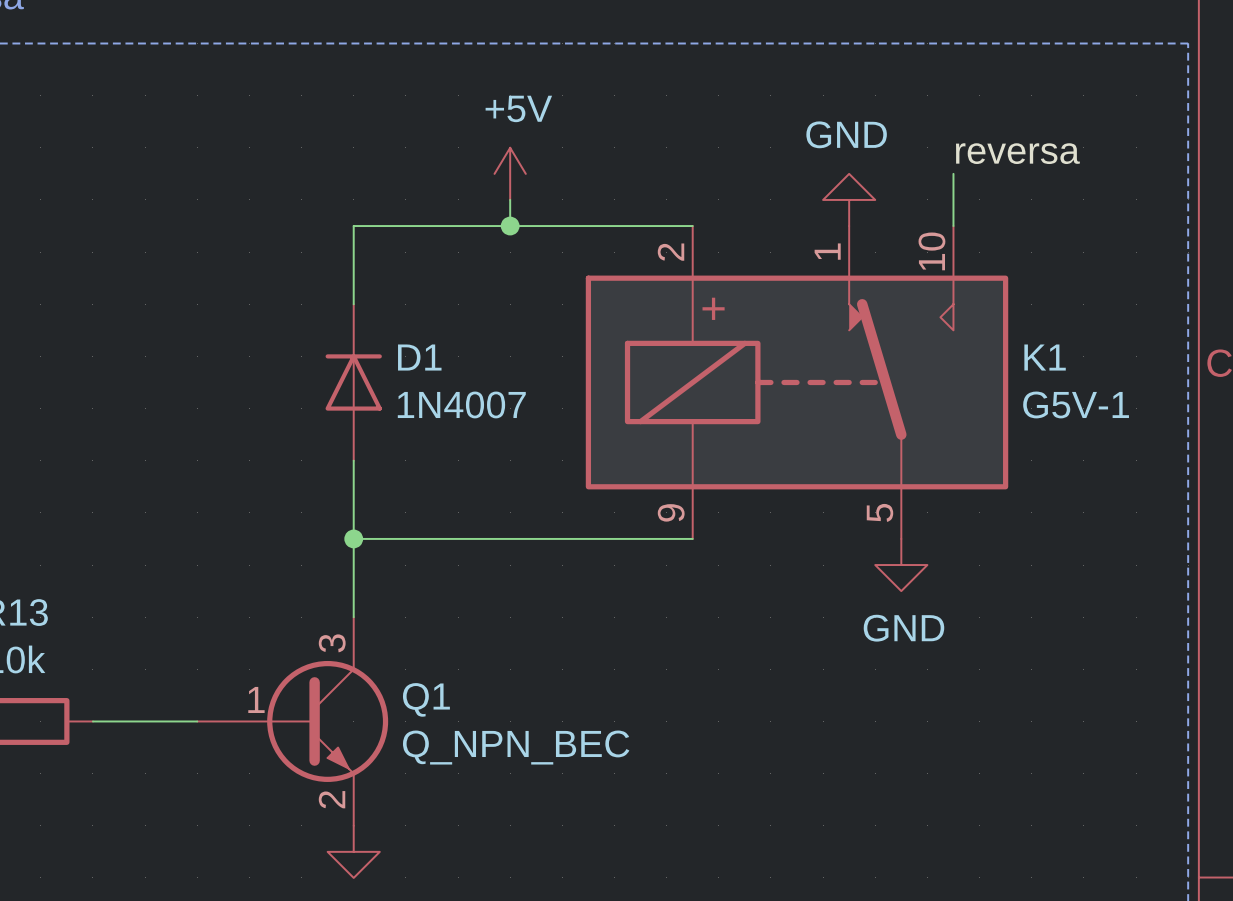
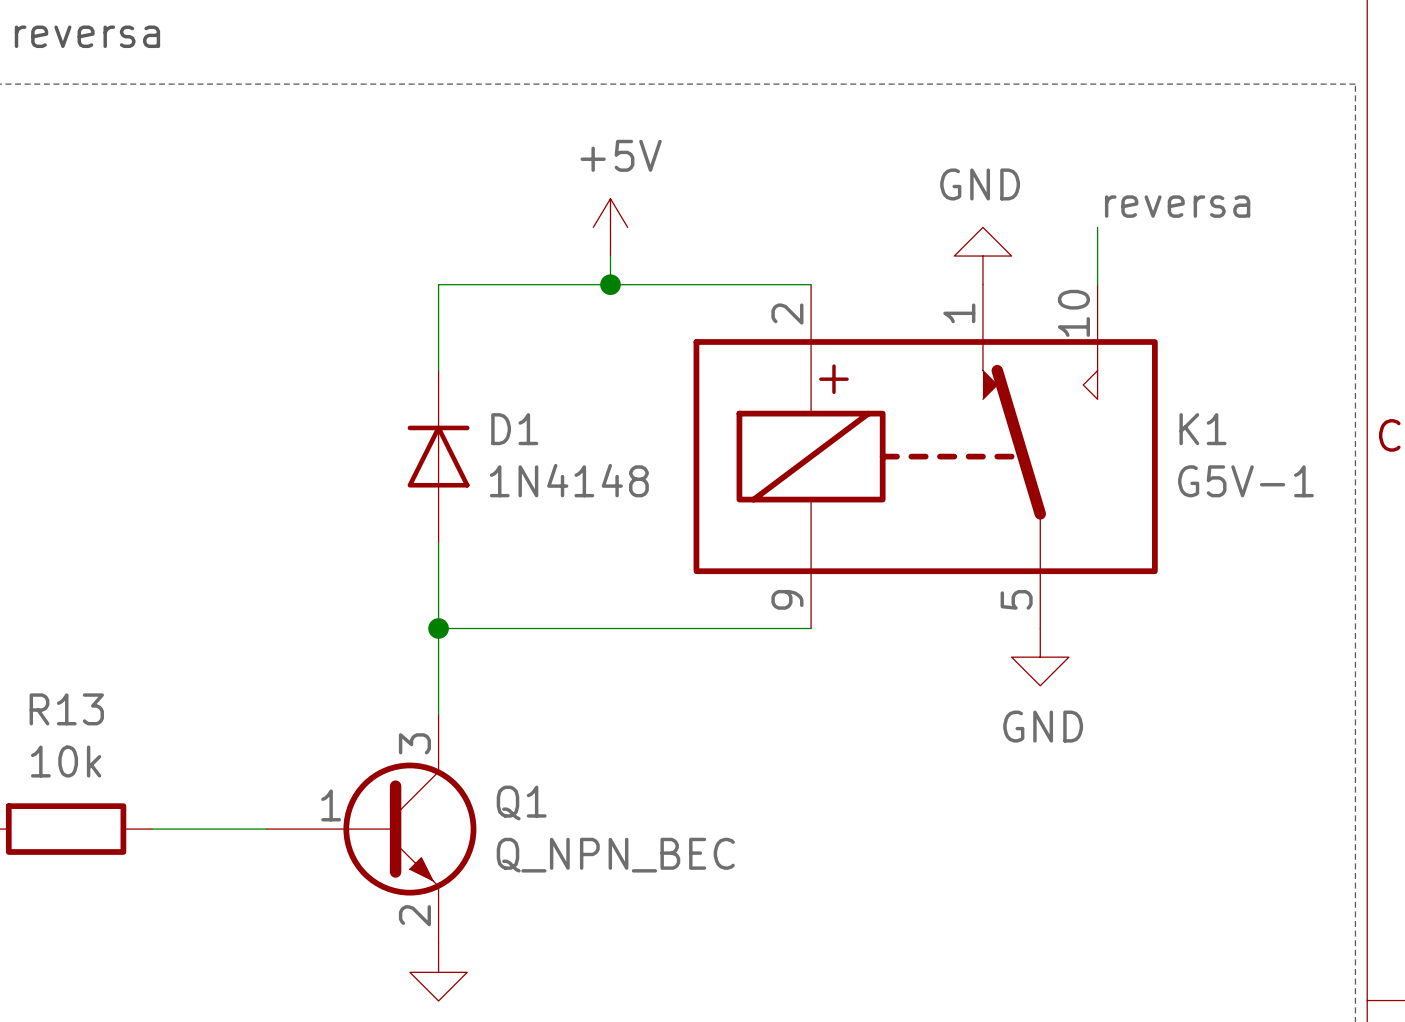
D1 value: 1N4007 (461, 404) -> 1N4148 (569, 480)

